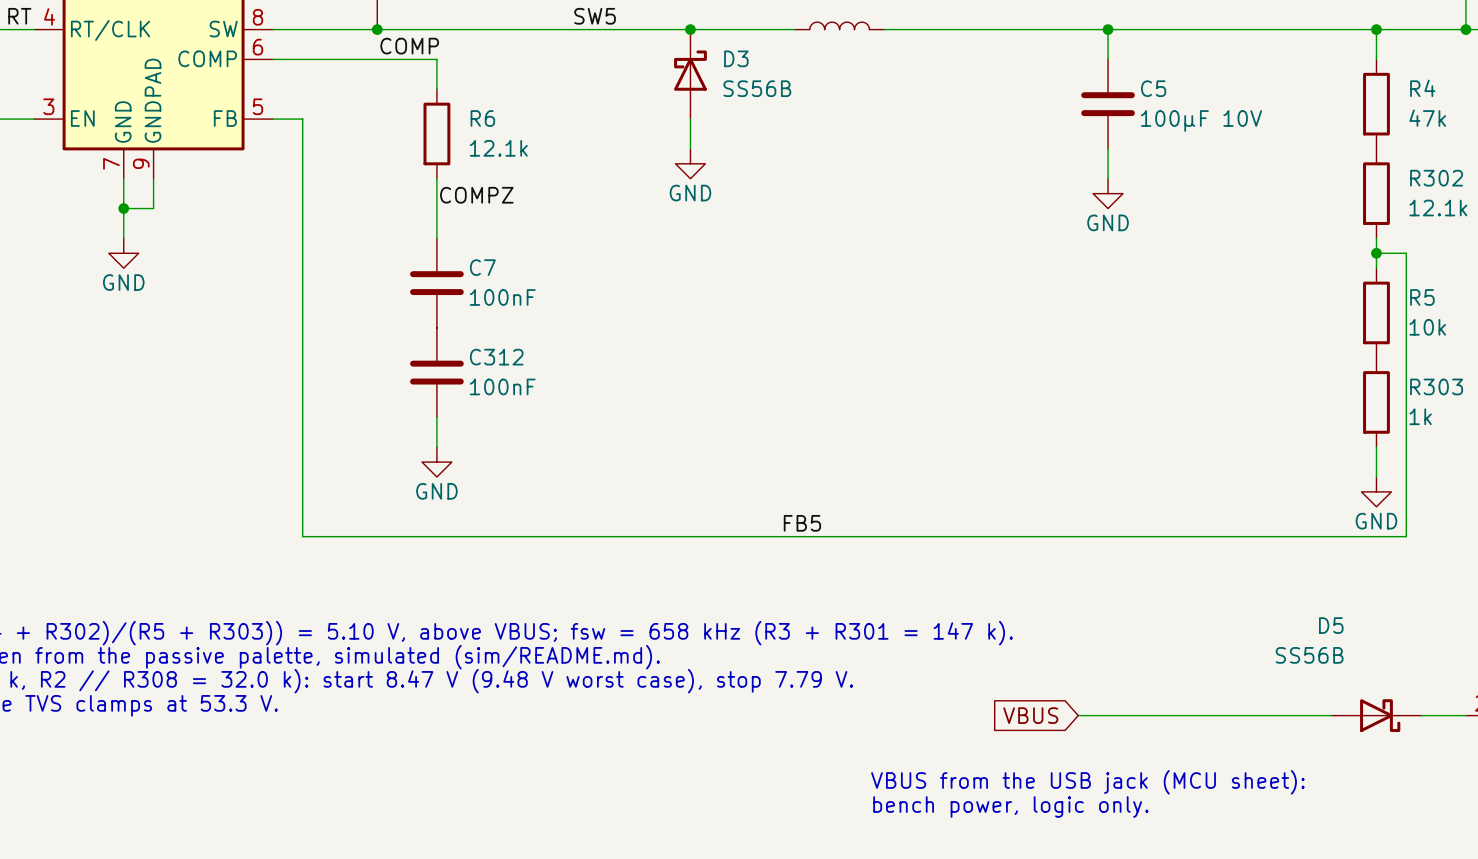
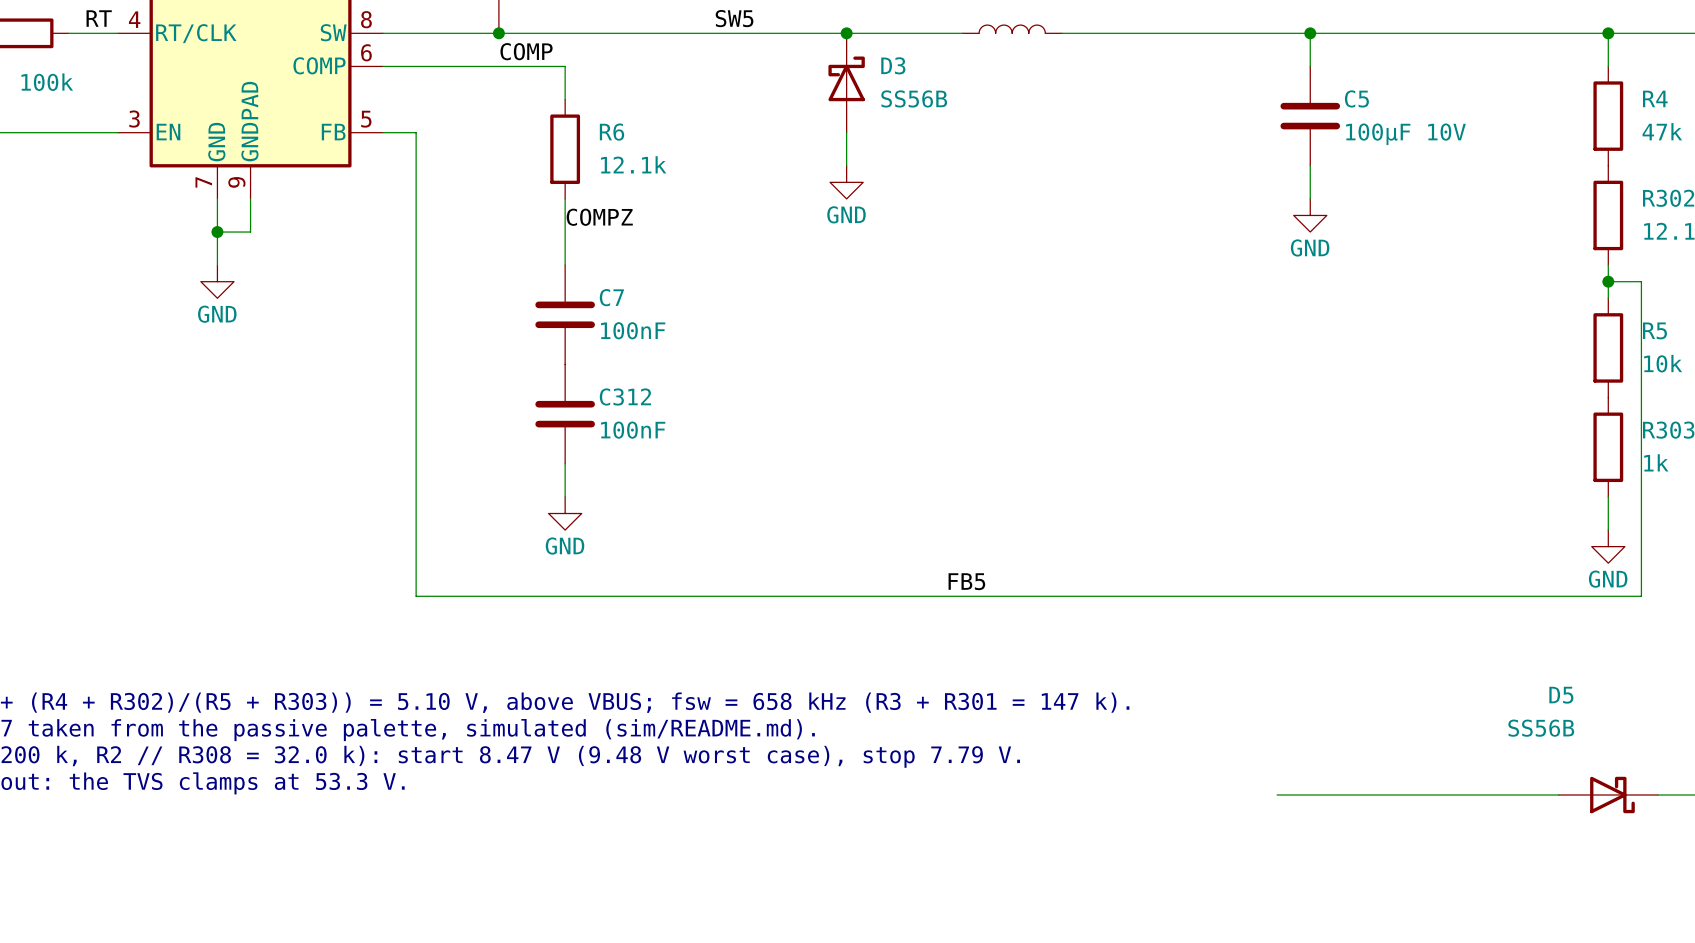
global label: VBUS (1030, 715) -> none
text: VBUS from the USB jack (MCU sheet): (1087, 782) -> none
text: bench power, logic only. (1010, 806) -> none

